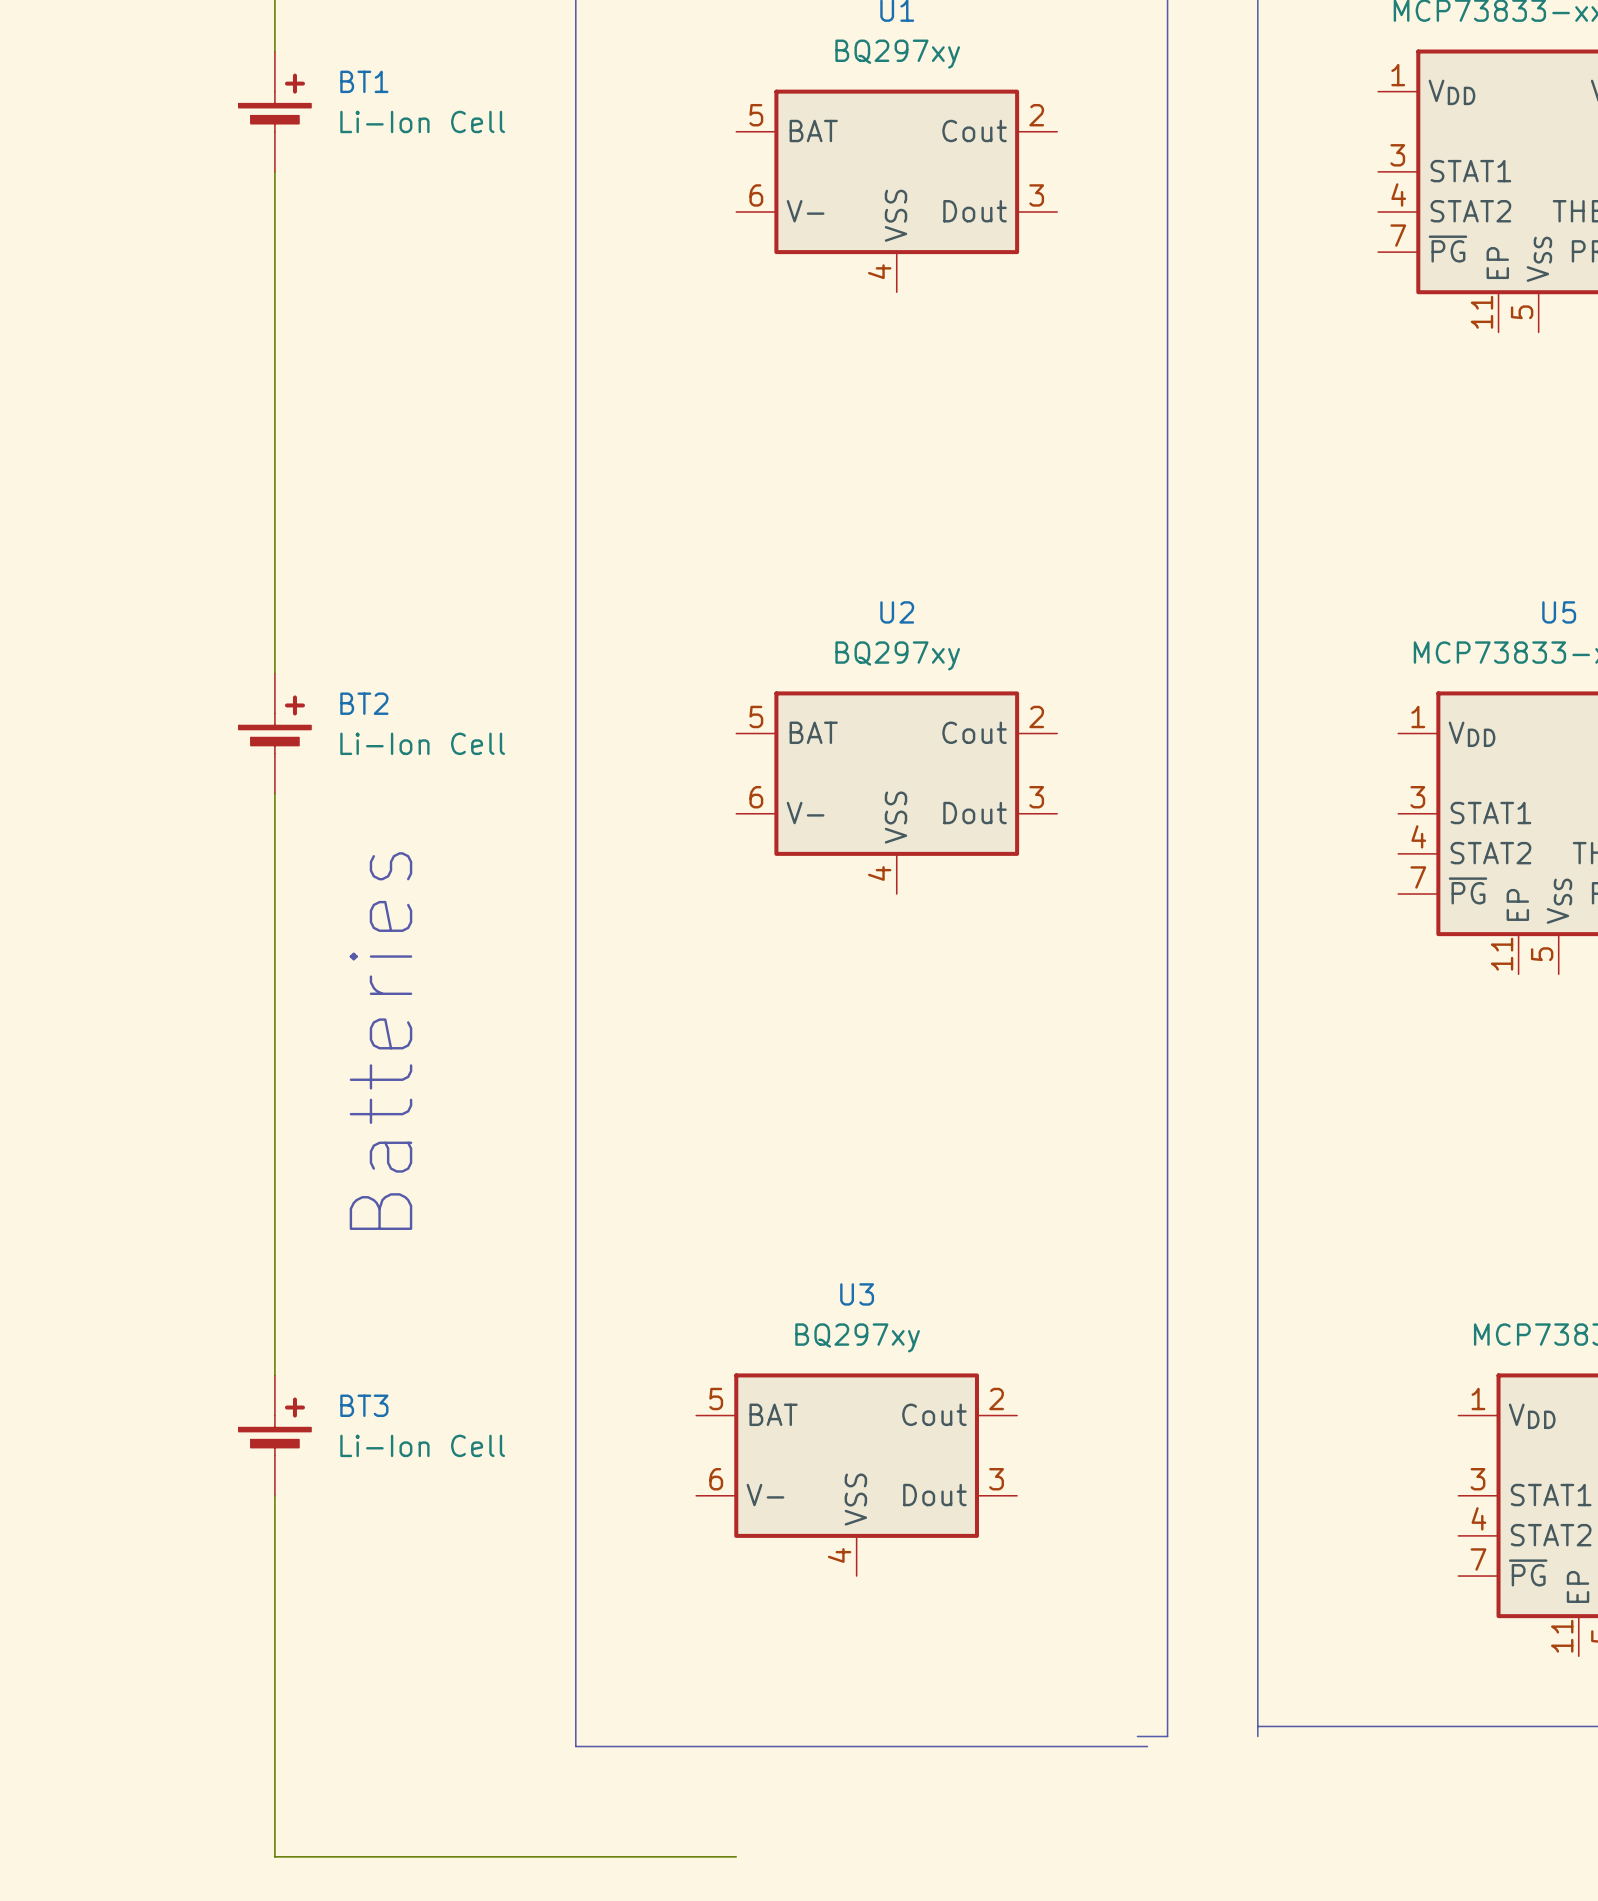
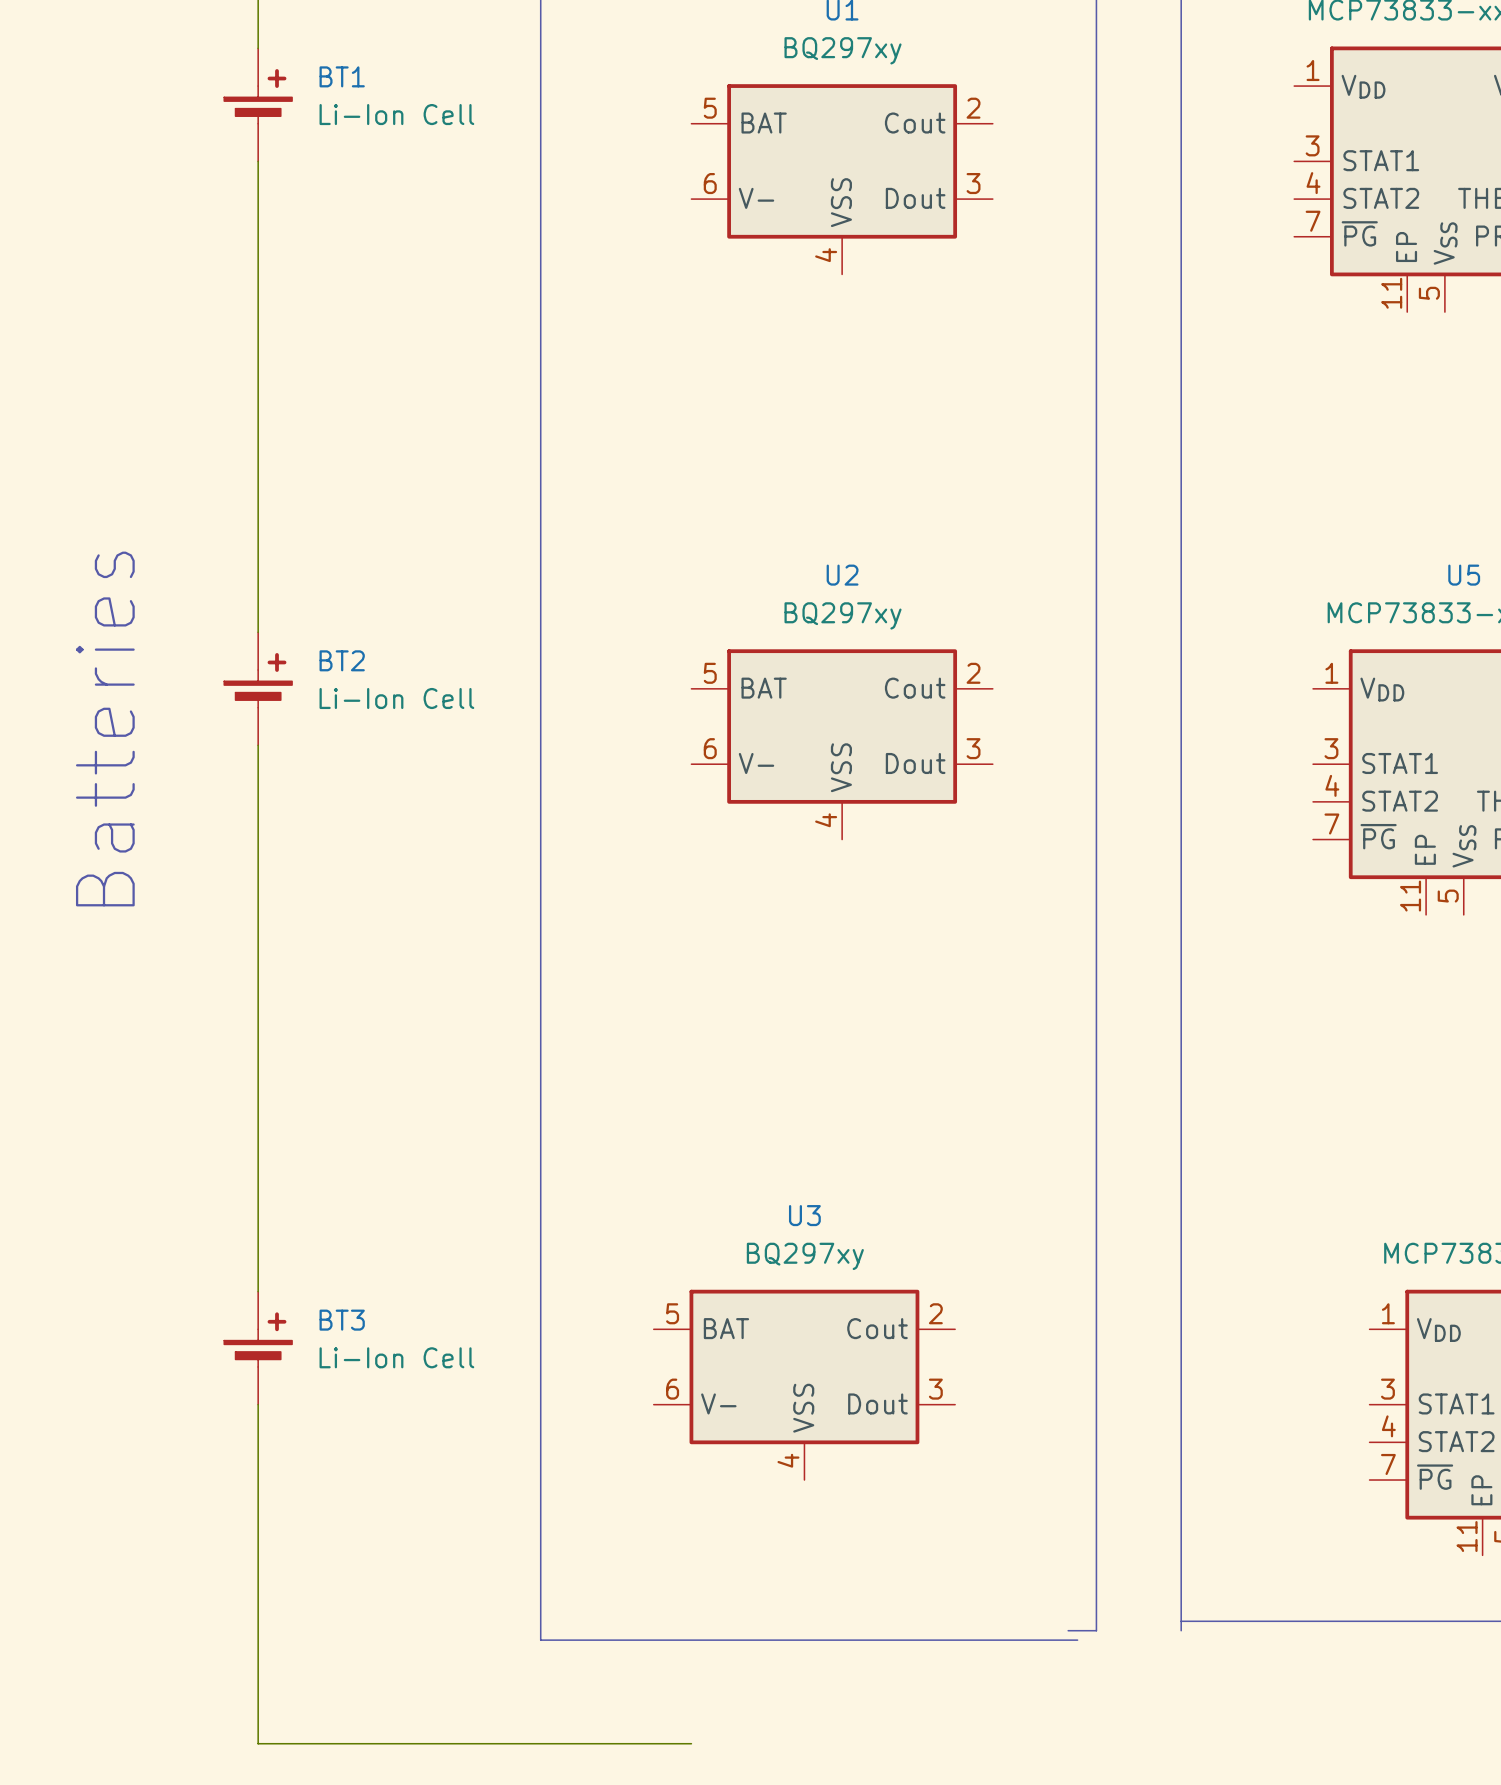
text position: Batteries (380, 1041) -> Batteries (105, 729)

